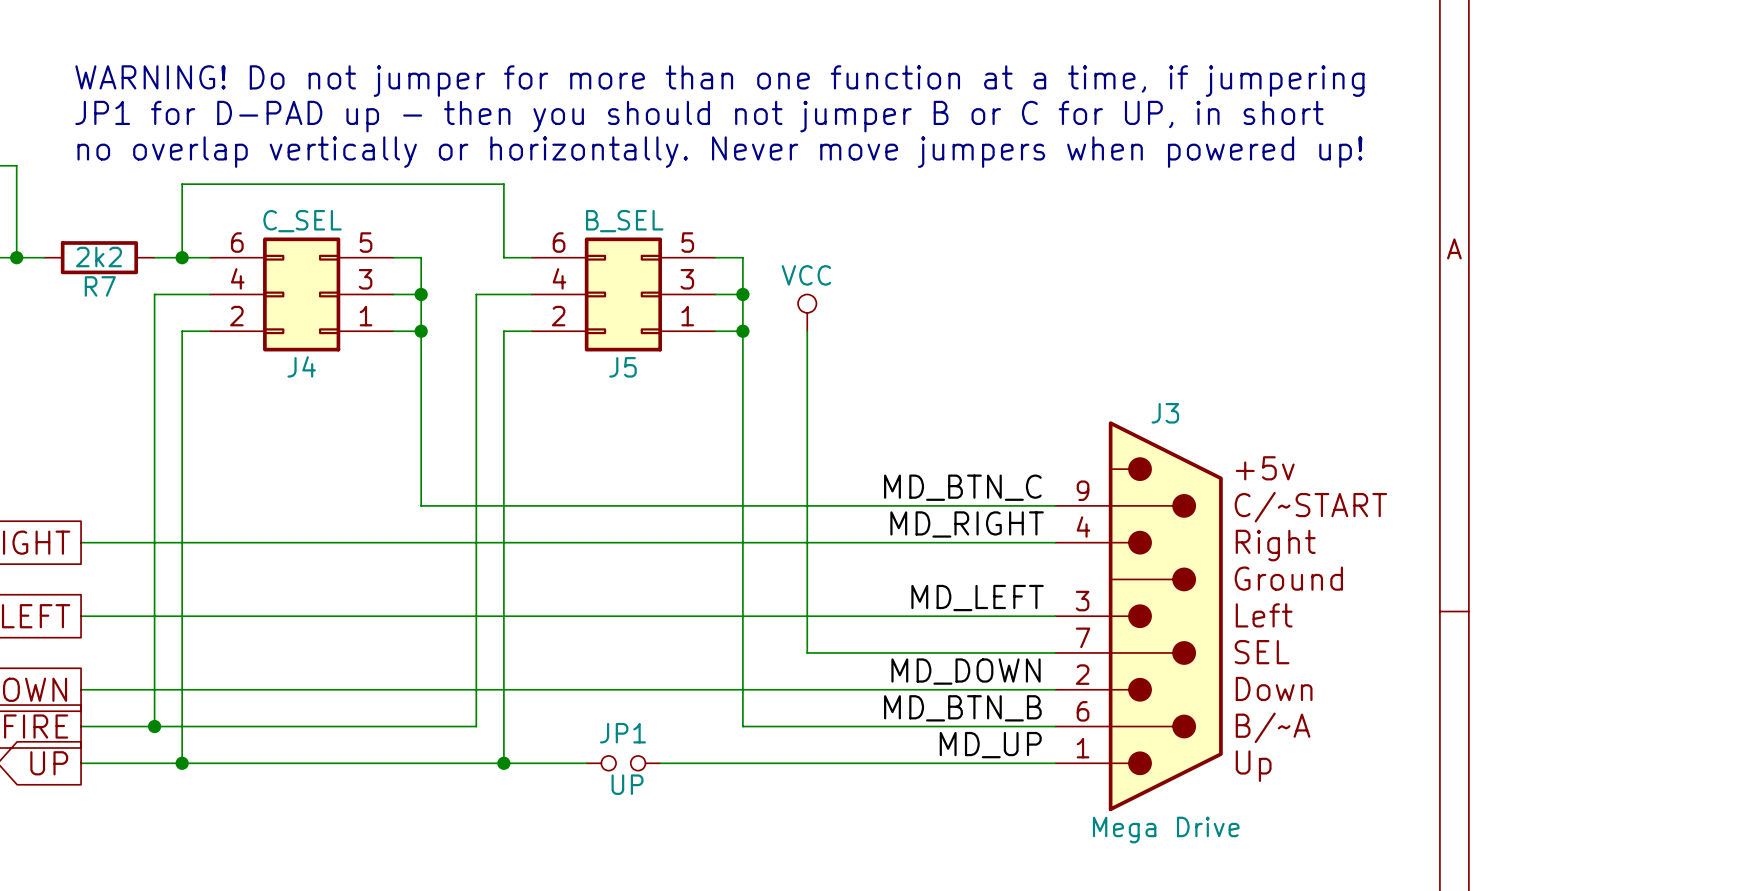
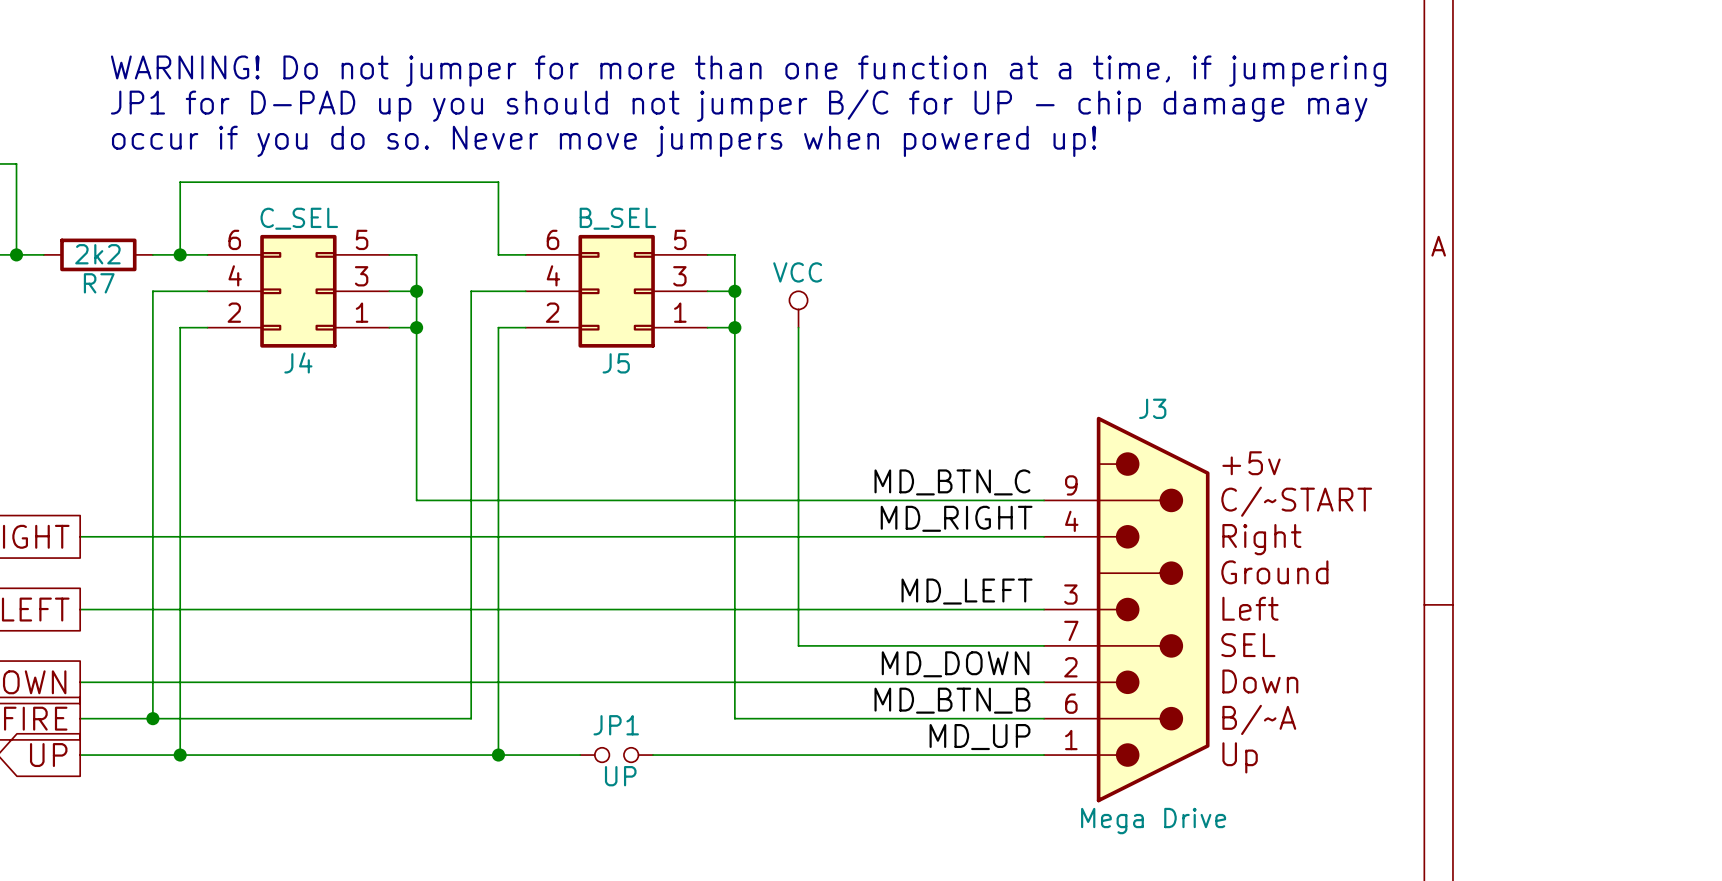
text position: WARNING! Do not jumper for more than one function at a time, if jumpering (719, 81) -> WARNING! Do not jumper for more than one function at a time, if jumpering (748, 71)
text: JP1 for D-PAD up - then you should not jumper B or C for UP, in short (699, 116) -> JP1 for D-PAD up you should not jumper B/C for UP - chip damage may (739, 105)
text: no overlap vertically or horizontally. Never move jumpers when powered up! (719, 152) -> occur if you do so. Never move jumpers when powered up! (604, 141)

